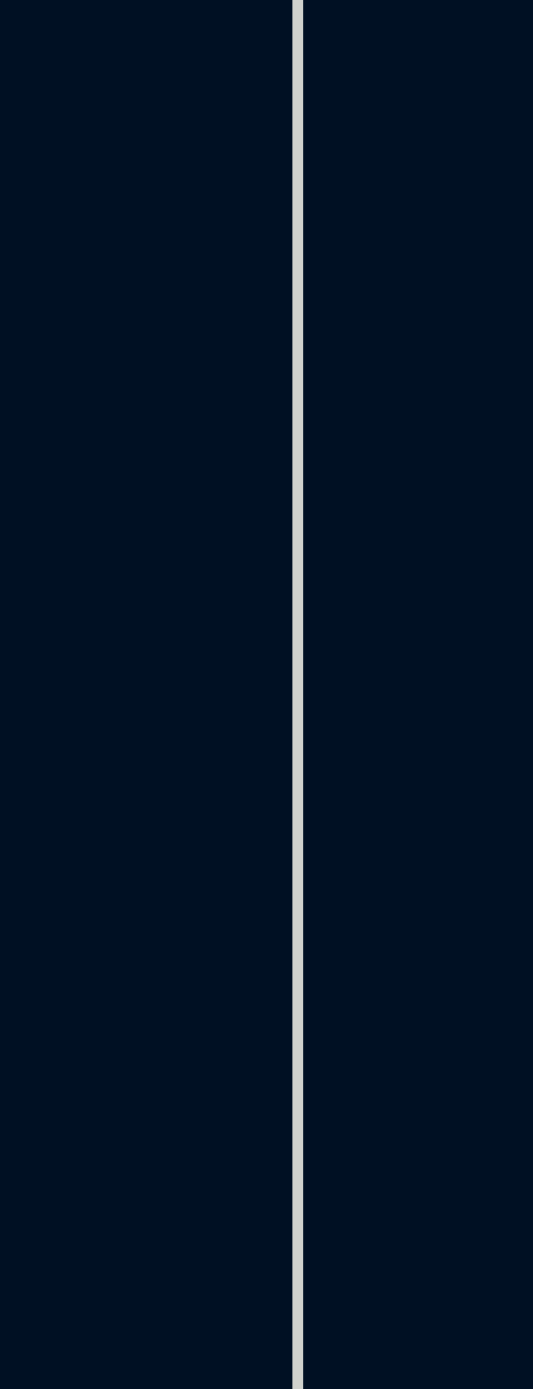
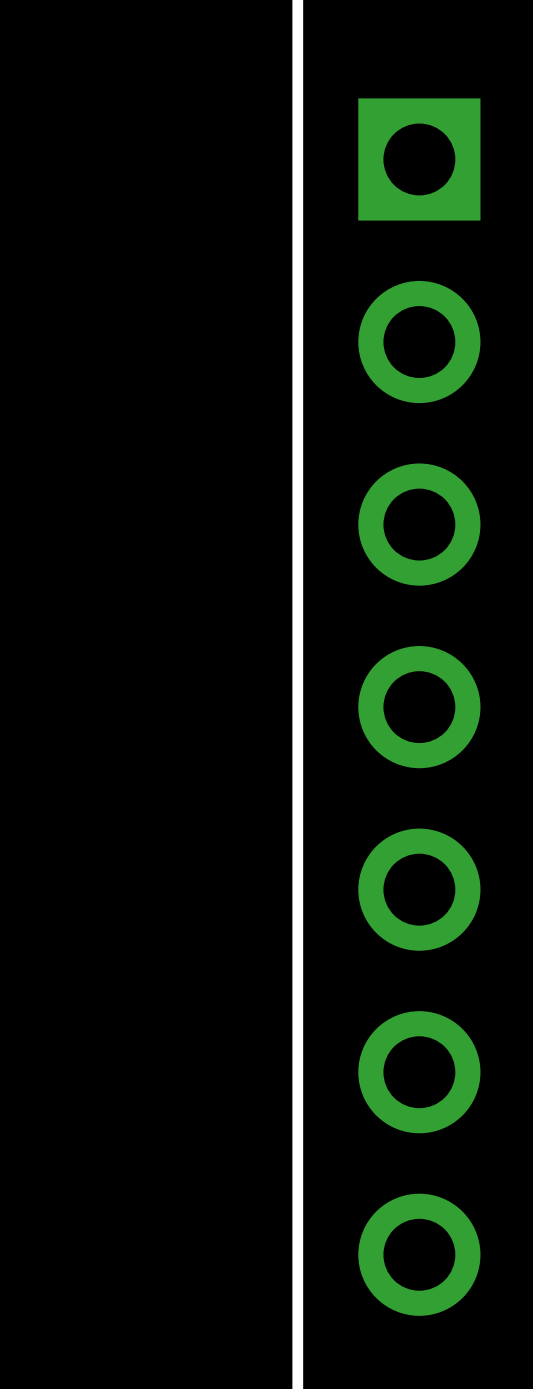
part: none -> (419, 707)

